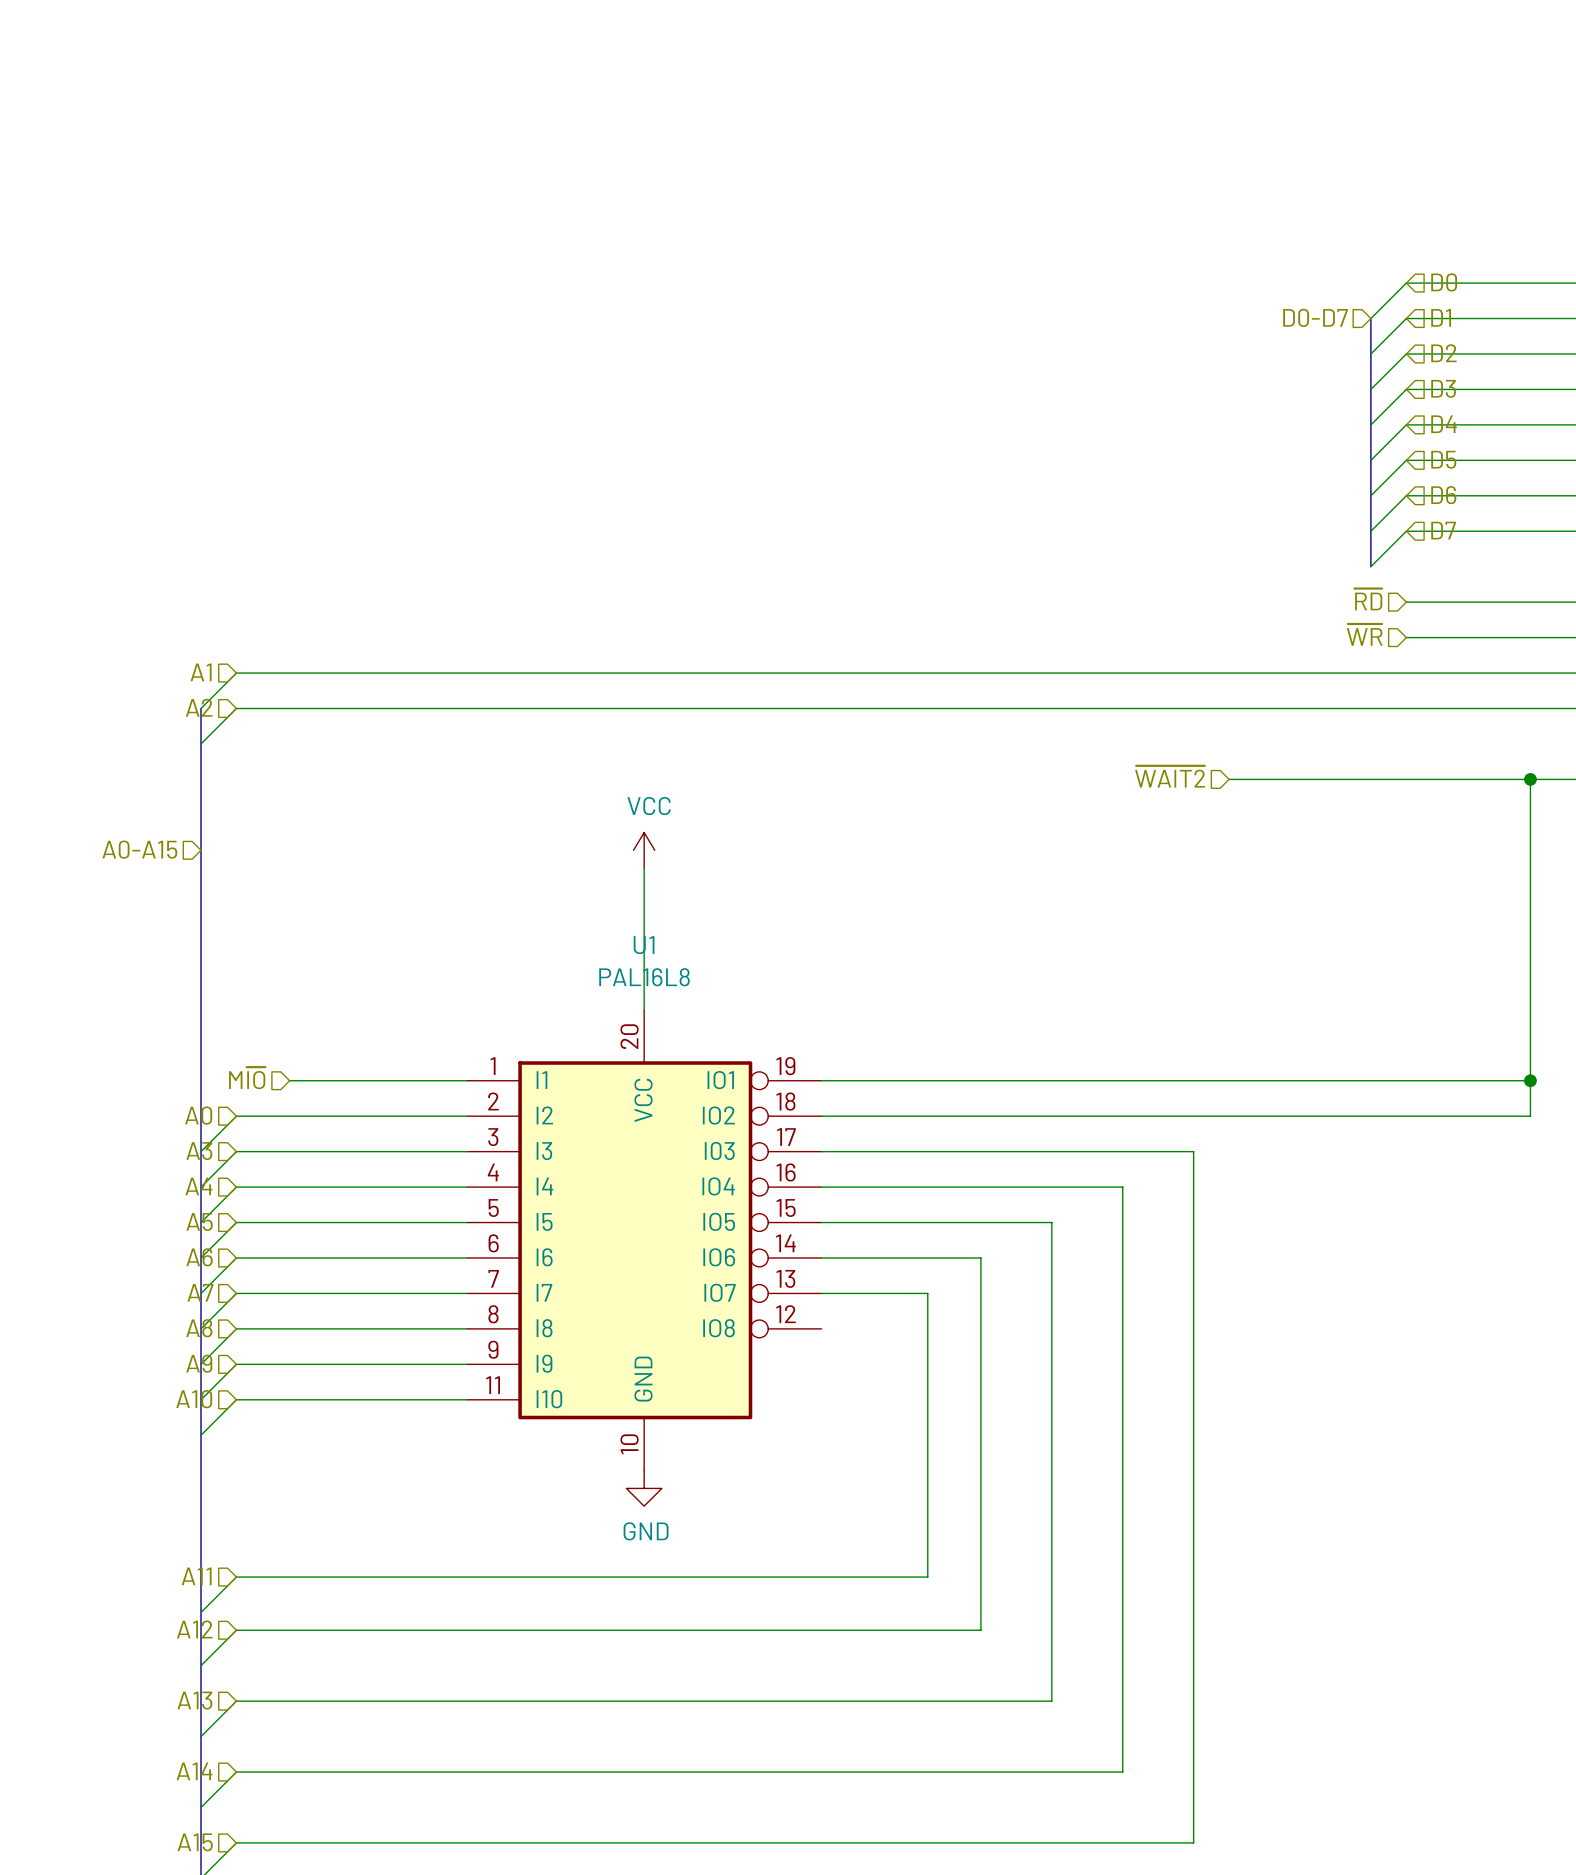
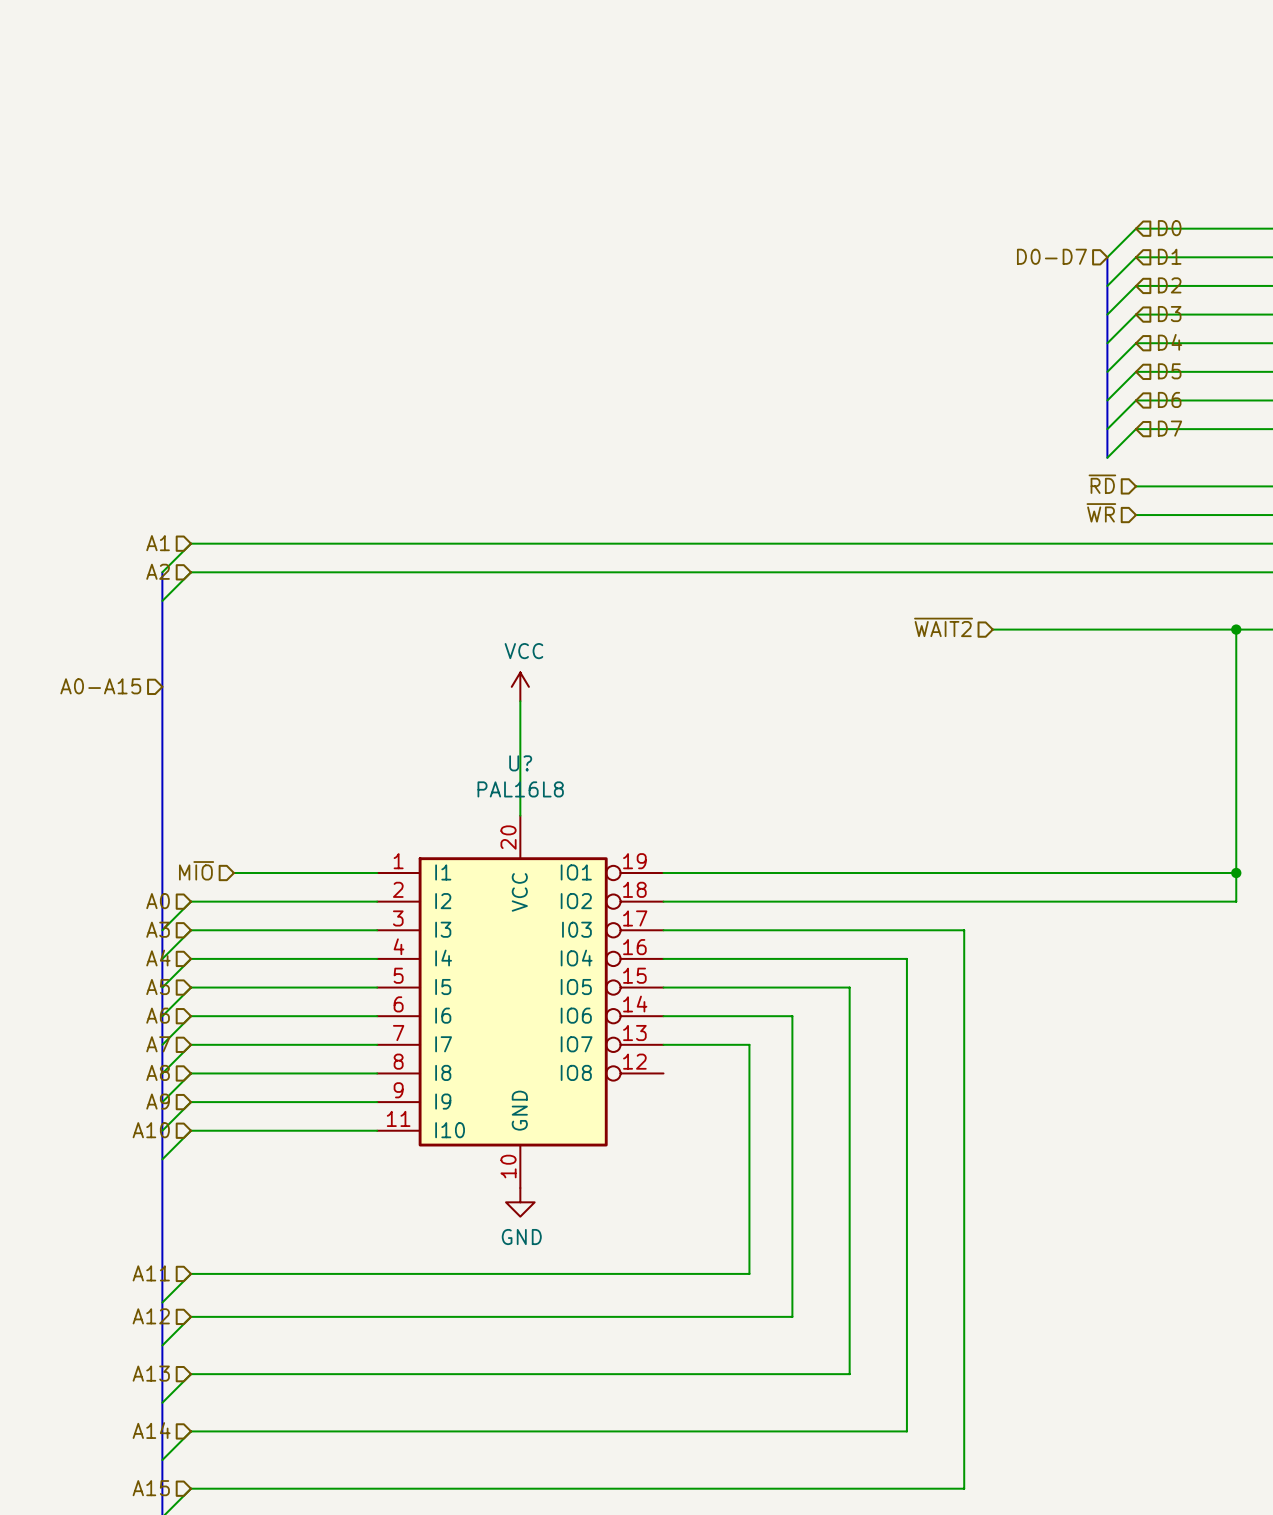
U1 name: U1 (644, 945) -> U? (520, 763)

